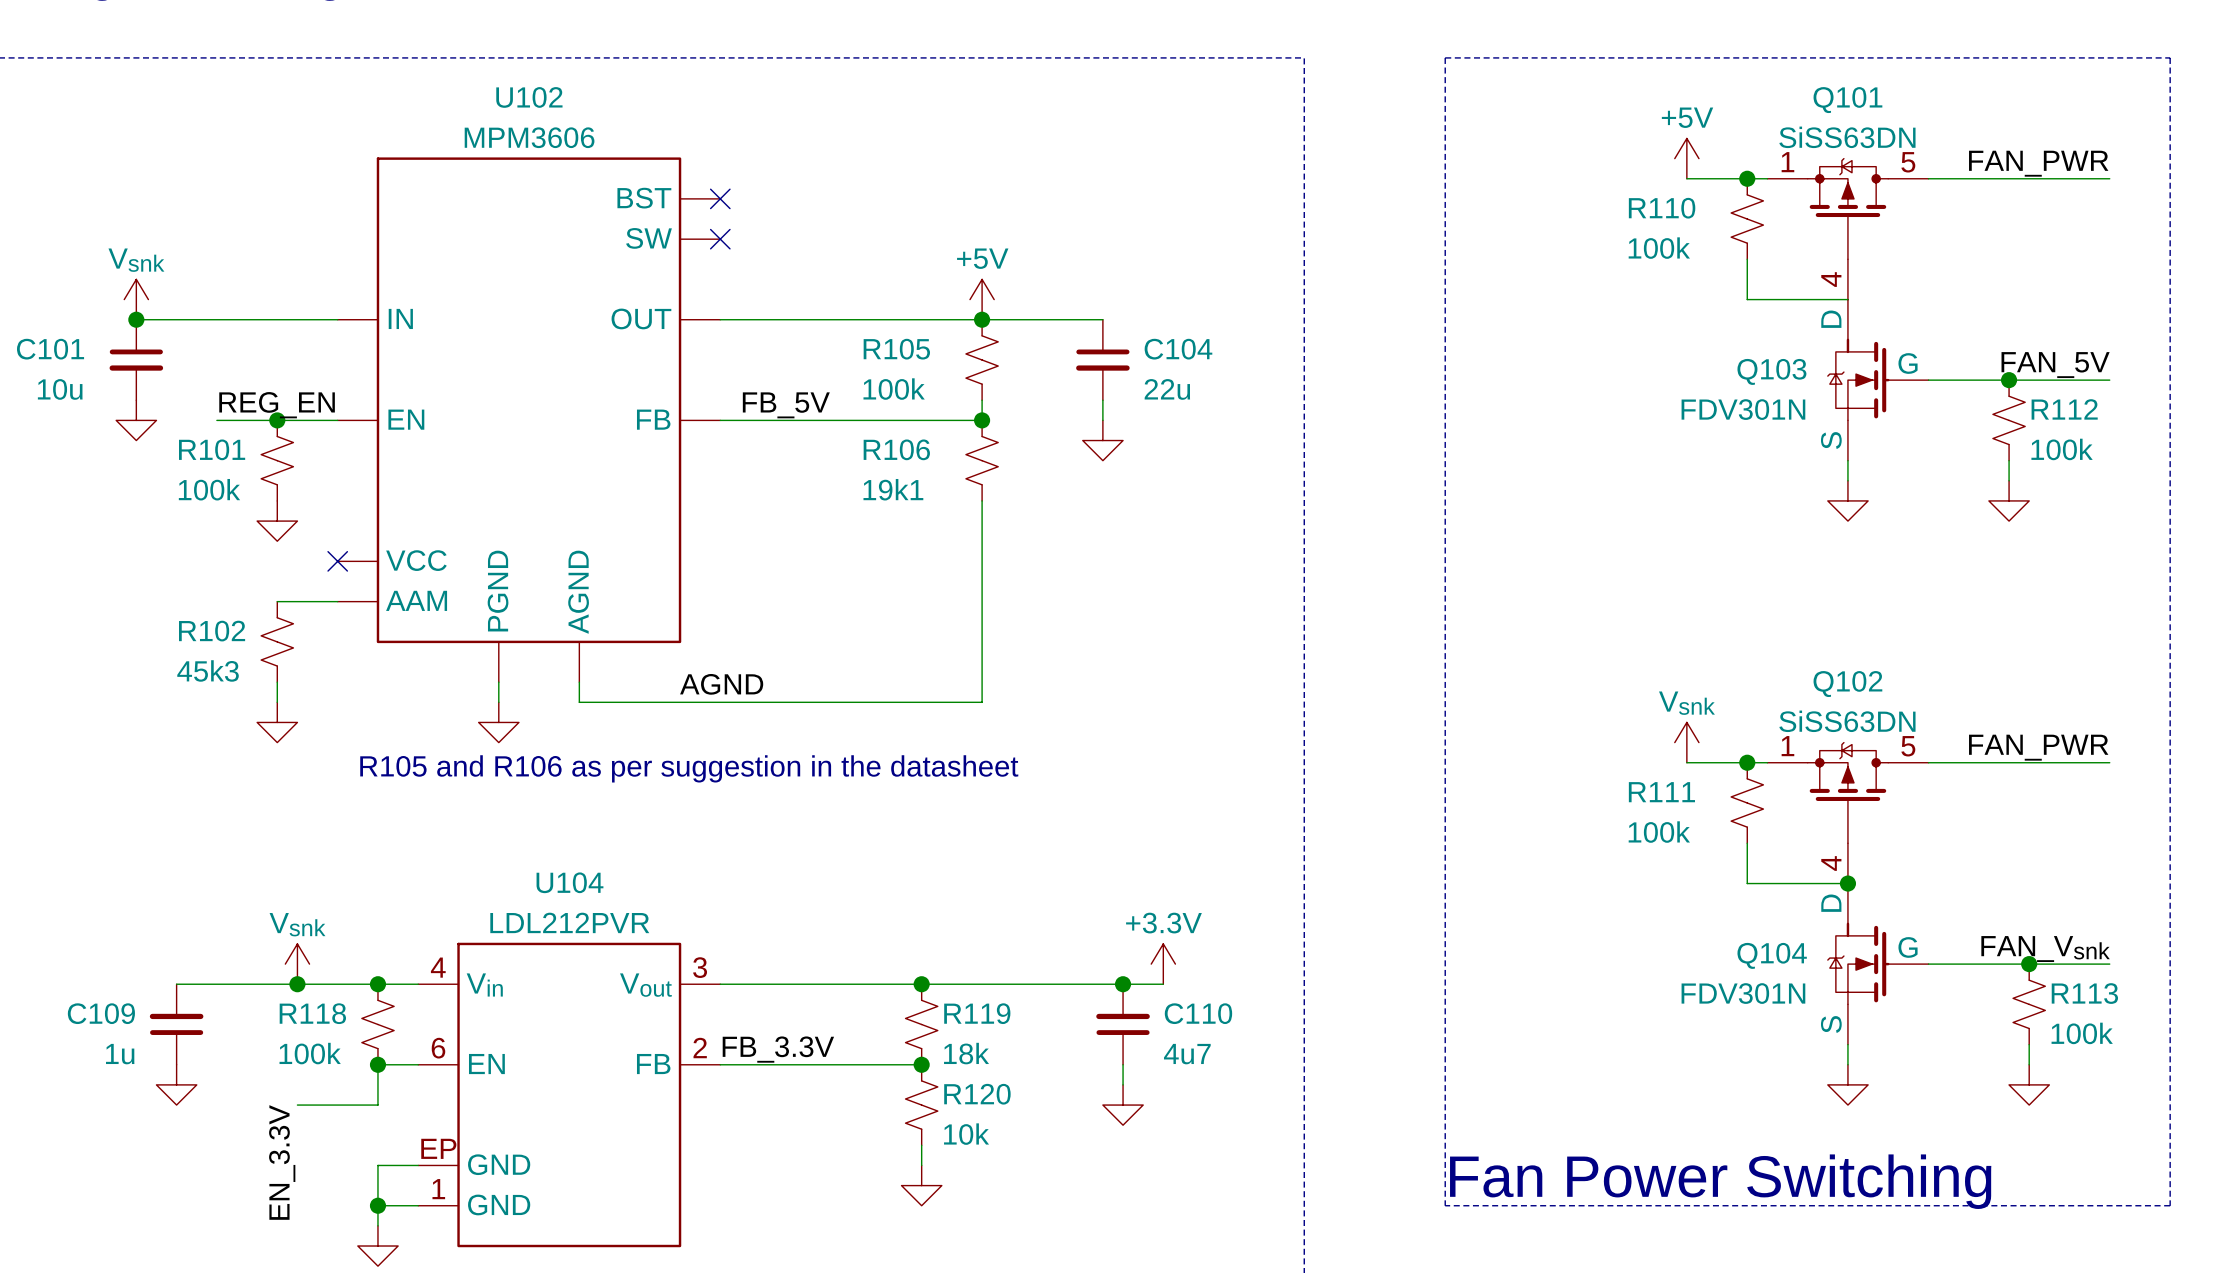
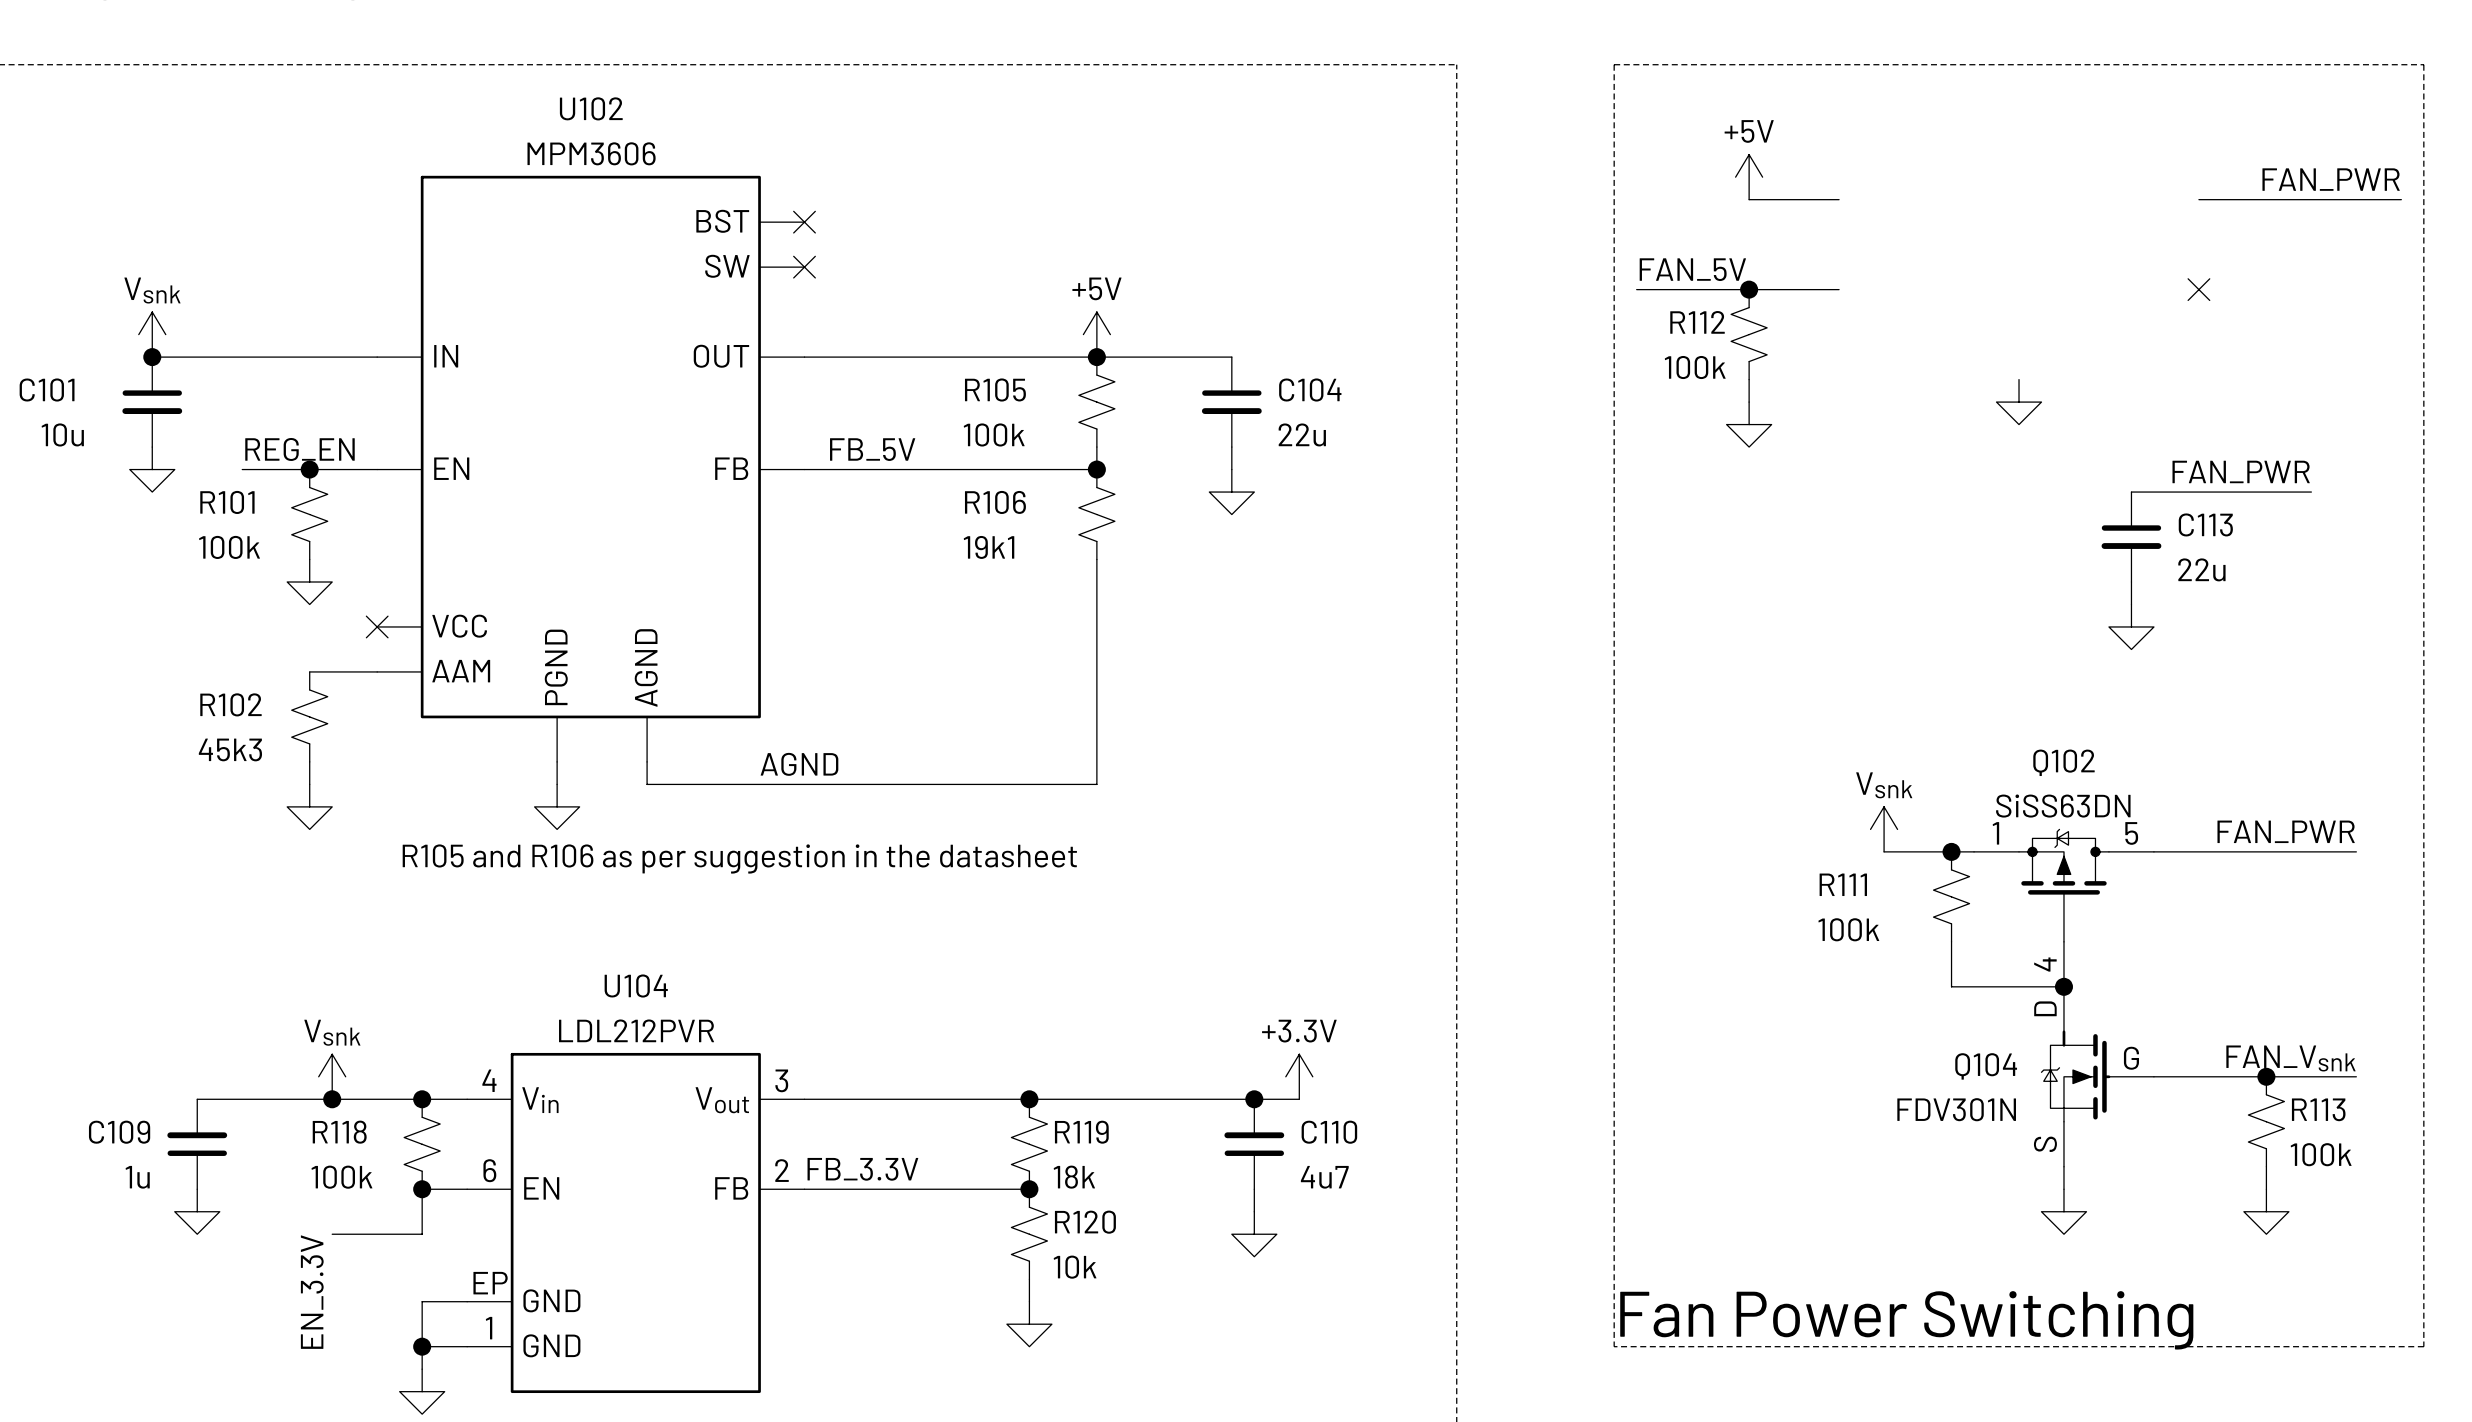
power symbol position: +5V (1686, 158) -> +5V (1749, 177)
label position: FAN_PWR (2038, 163) -> FAN_PWR (2331, 179)
wire: (1686, 178) (1767, 178) -> (1749, 199) (1839, 199)
junction: (1747, 178) -> none
wire: (1928, 178) (1968, 178) -> (2356, 199) (2401, 199)
R110: 100k (1747, 219) -> none
Q101: SiSS63DN (1847, 229) -> none
label: none -> FAN_5V (1692, 269)
wire: none -> (1636, 289) (1839, 289)
junction: none -> (1749, 289)
wire: (1747, 259) (1747, 299) (1847, 299) -> none
no-connect mark: none -> (2198, 289)
wire: none -> (1749, 379) (1749, 402)
power symbol: none -> (2019, 402)
label: FAN_5V (2055, 365) -> none
power symbol: none -> (1749, 424)
Q103: FDV301N (1878, 380) -> none
wire: (1928, 380) (2109, 380) -> none
junction: (2009, 380) -> none
R112 flip: as is (2009, 420) -> left-right (1749, 334)
R112 position: (2009, 420) -> (1749, 334)
label: none -> FAN_PWR (2241, 471)
wire: none -> (2131, 492) (2311, 492)
wire: (1847, 460) (1847, 480) -> (2131, 582) (2131, 604)
wire: (2009, 460) (2009, 480) -> none
C113: none -> 22u (2131, 537)
power symbol: (1847, 500) -> none
power symbol: (2009, 500) -> none
power symbol: none -> (2131, 626)

